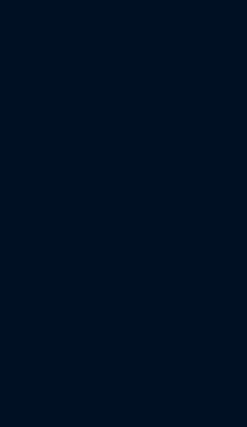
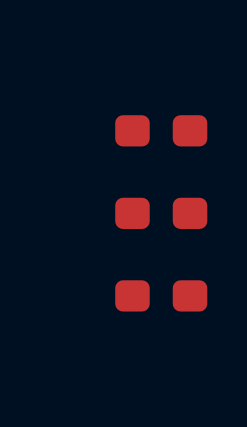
part: none -> (161, 130)
part: none -> (161, 213)
part: none -> (161, 295)

